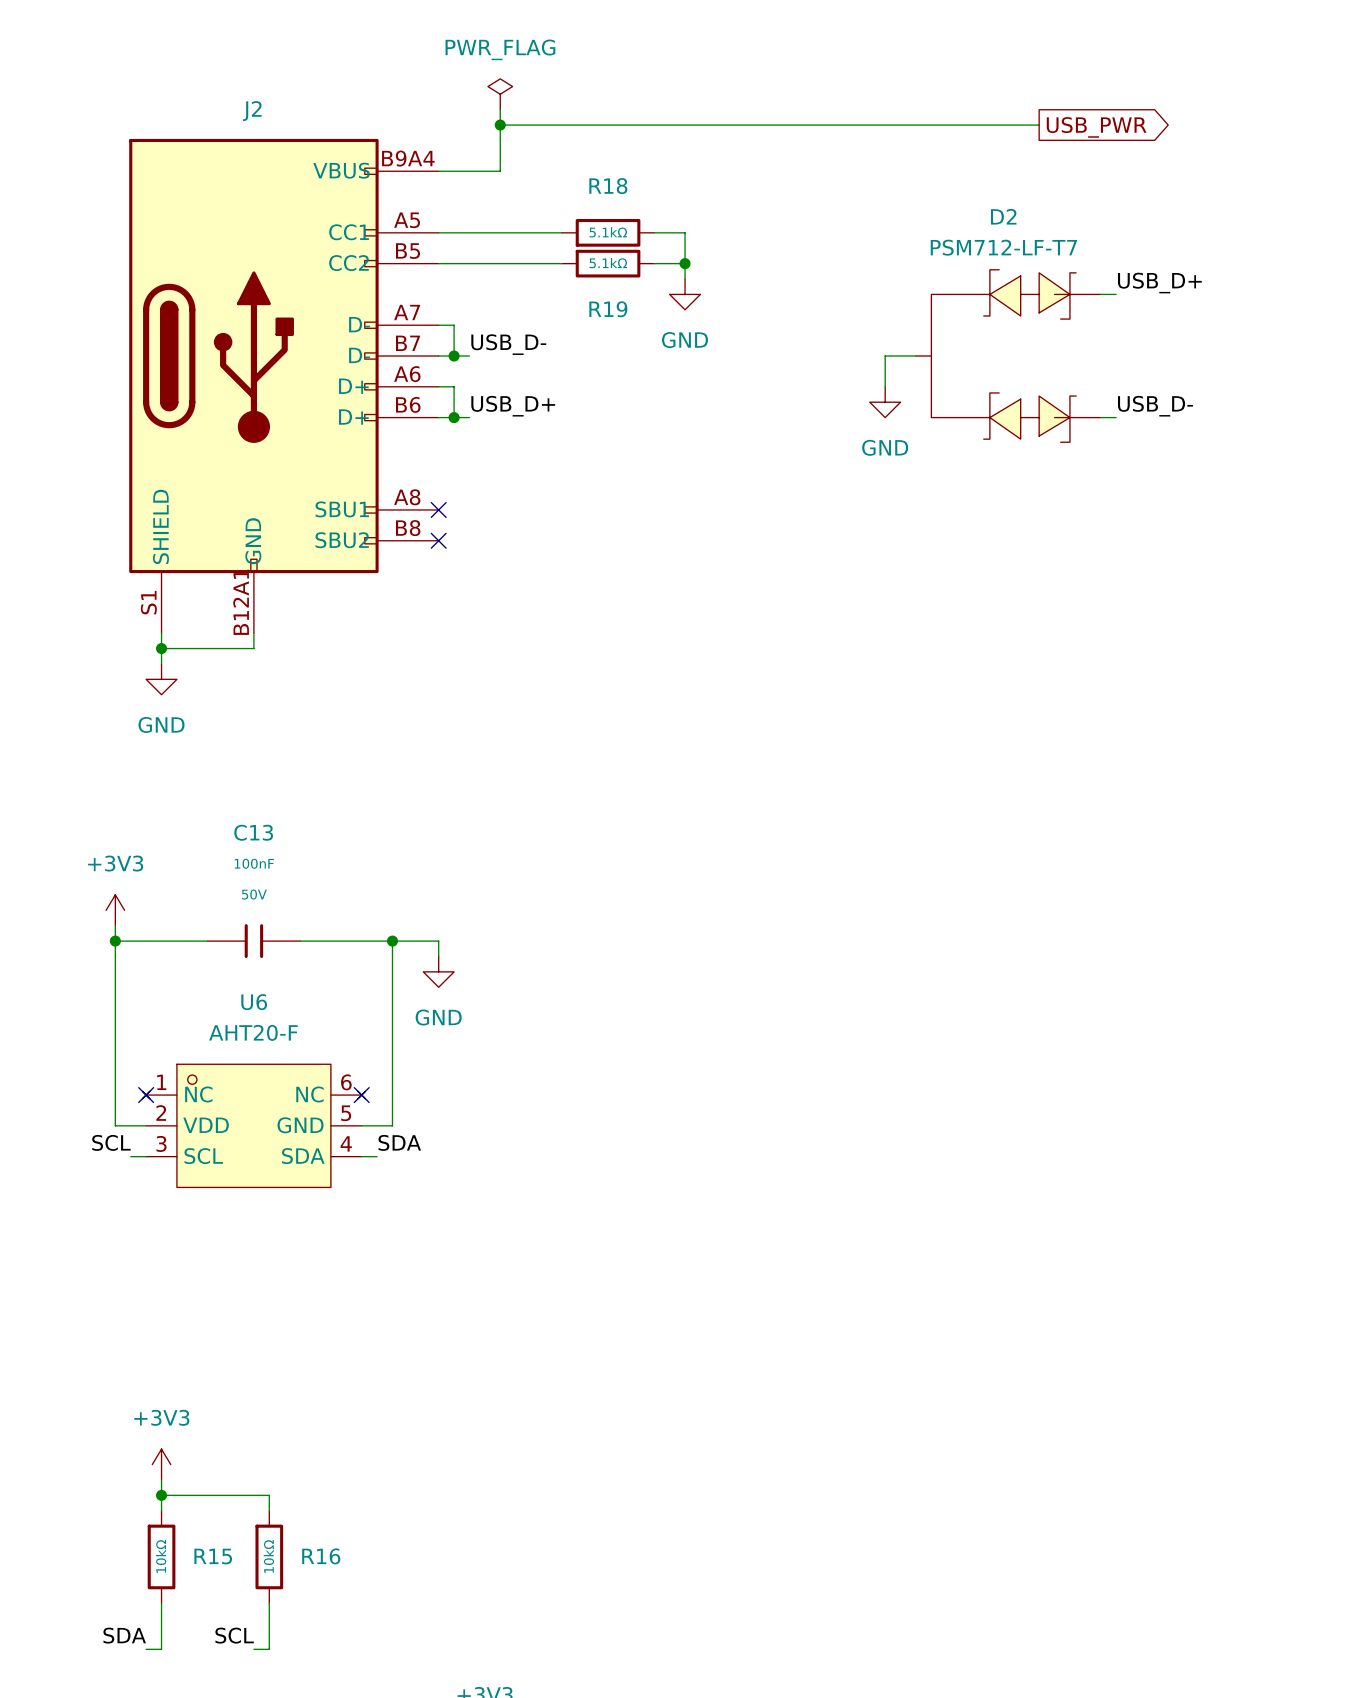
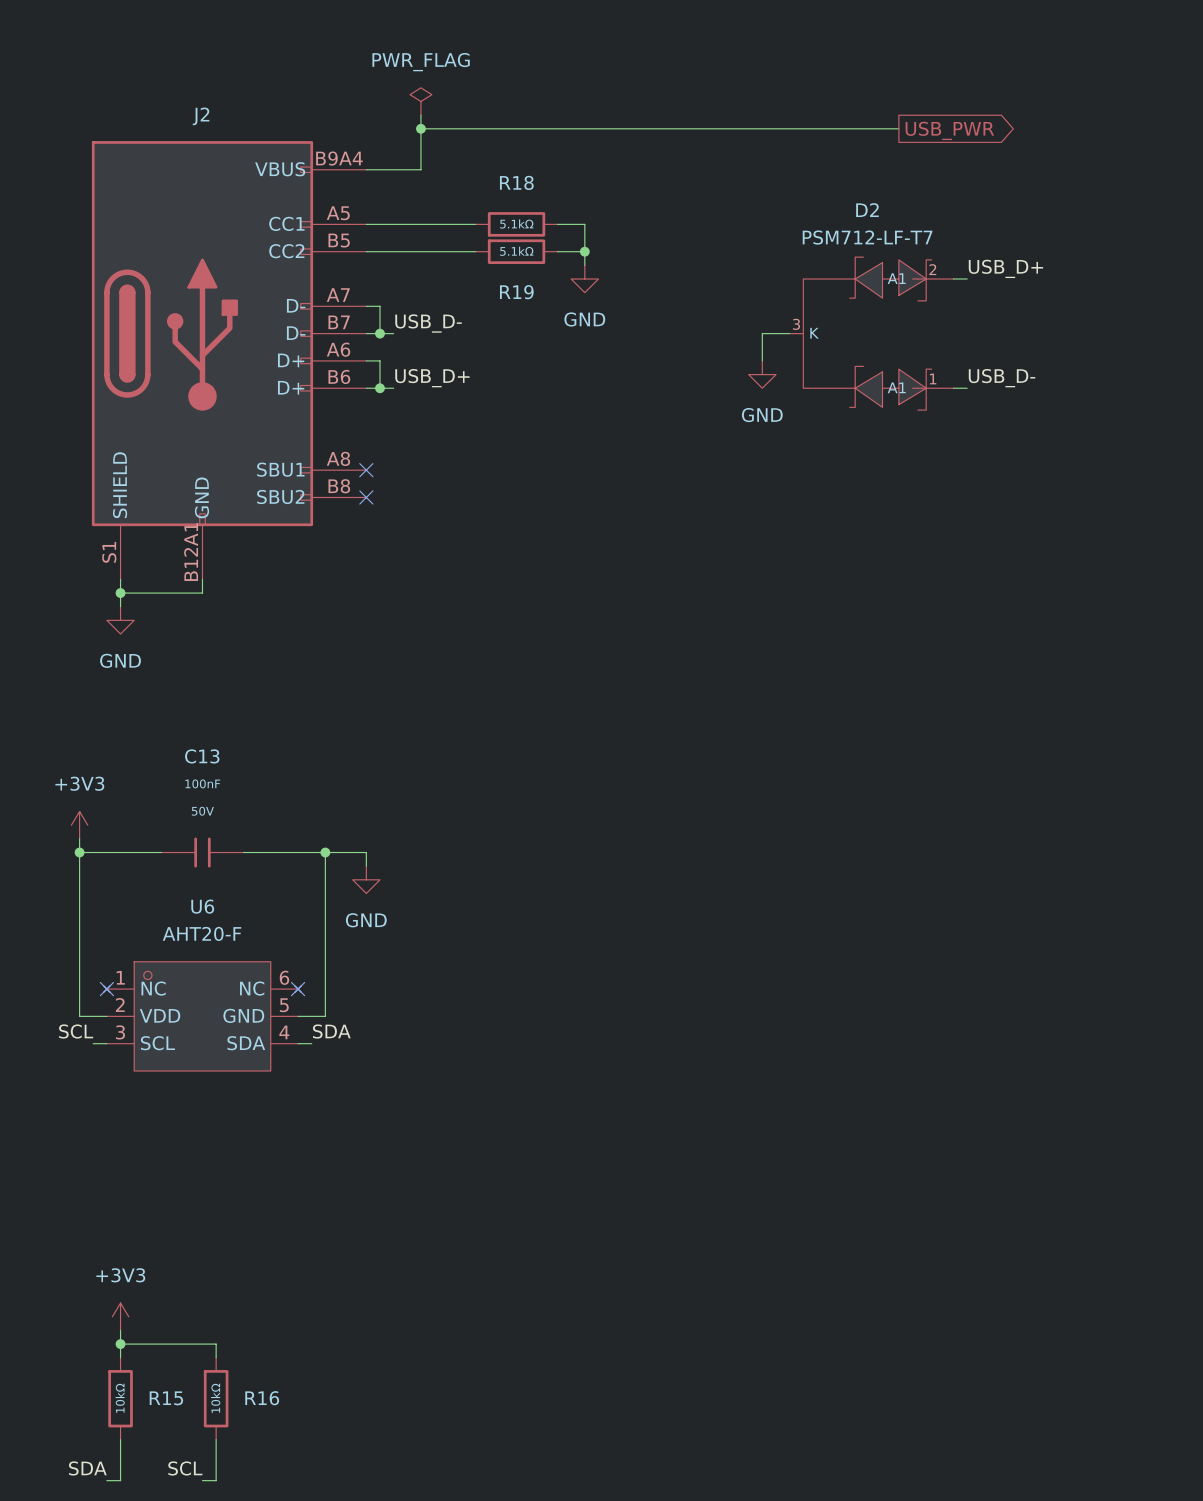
D2 pin number: none -> 2 (932, 269)
D2 pin name: none -> A1 (896, 278)
D2 pin number: none -> 3 (796, 324)
D2 pin name: none -> K (814, 333)
D2 pin number: none -> 1 (933, 378)
D2 pin name: none -> A1 (896, 387)

